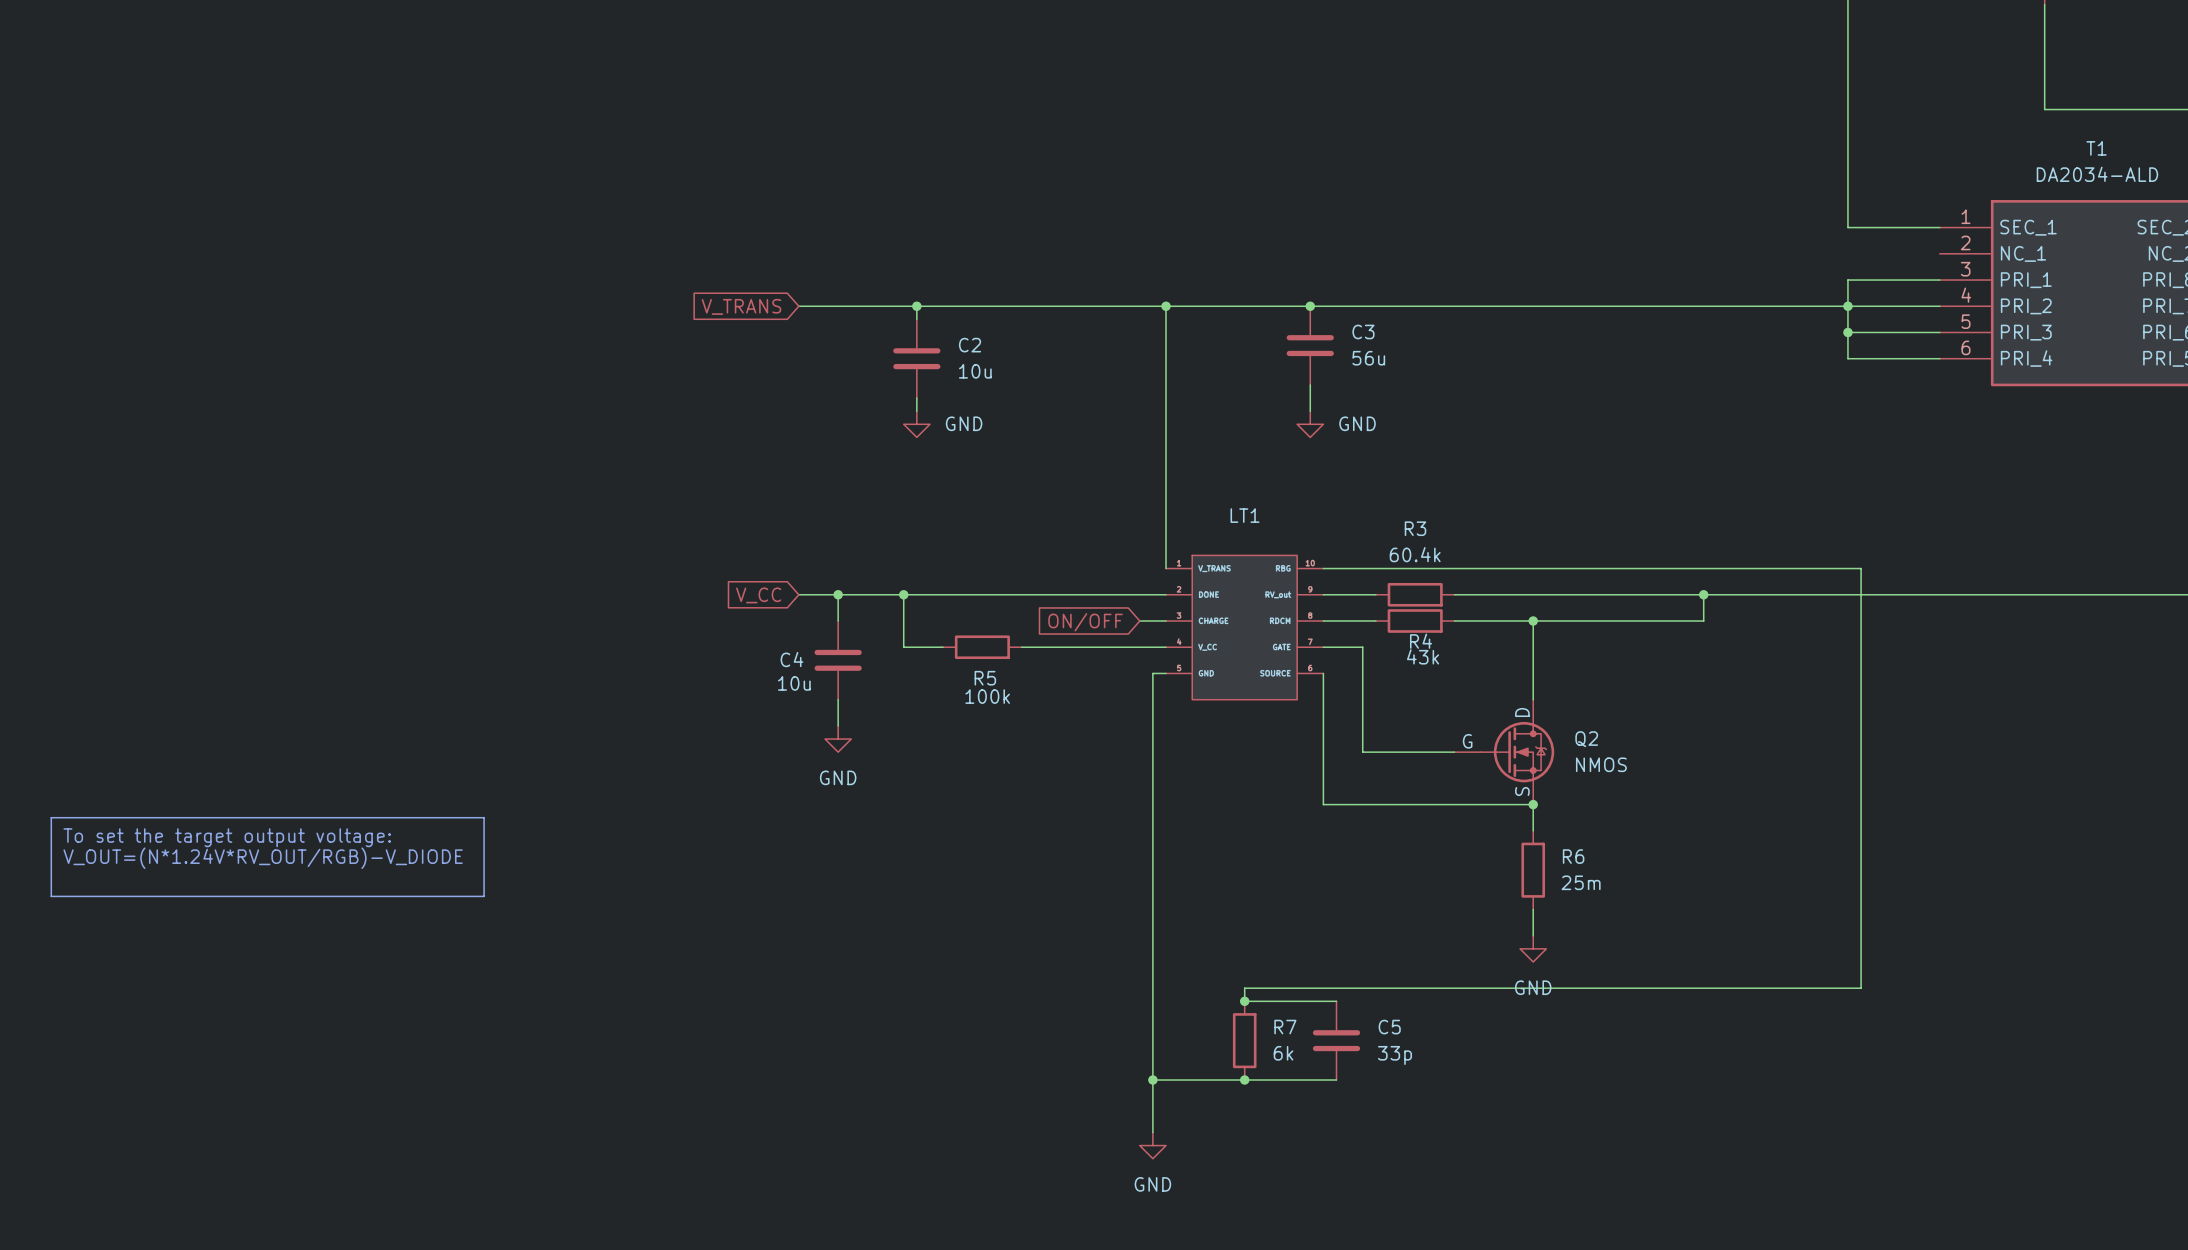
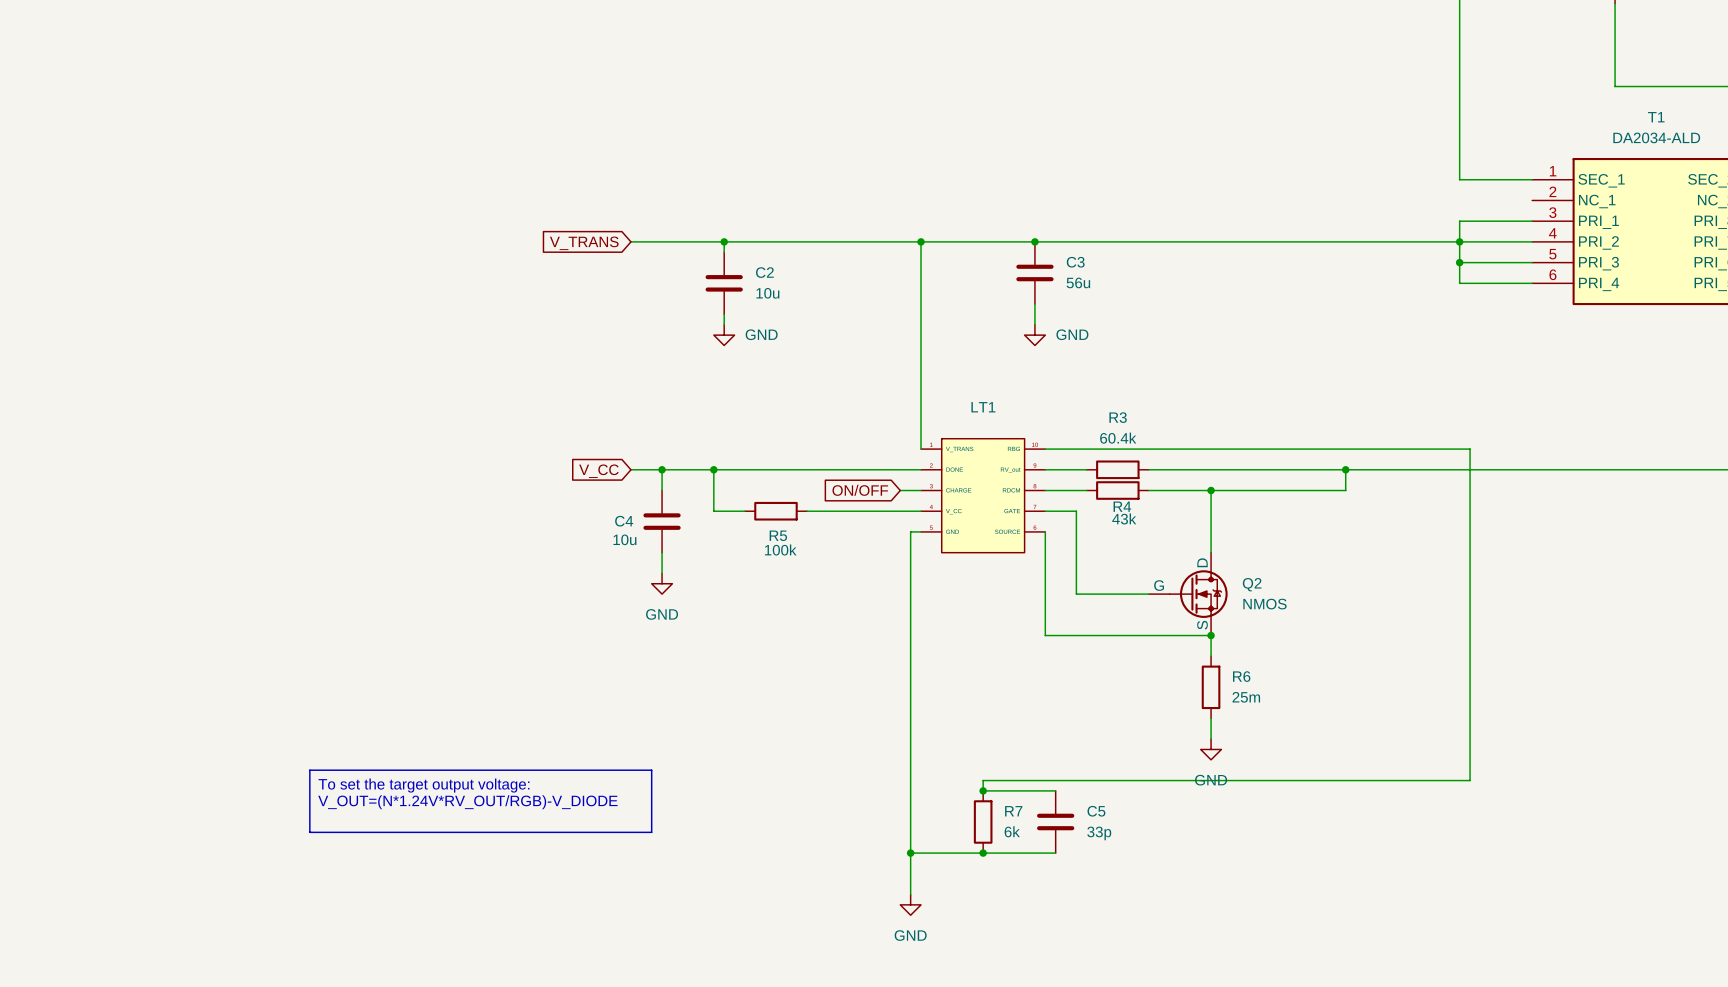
line: (51, 817) (484, 817) (484, 896) (51, 896) (51, 817) -> none
text: To set the target output voltage: (227, 837) -> none
text: V_OUT=(N*1.24V*RV_OUT/RGB)-V_DIODE (263, 858) -> none
line: none -> (309, 770) (651, 770) (651, 832) (309, 832) (309, 770)
text: none -> To set the target output voltage: (424, 785)
text: none -> V_OUT=(N*1.24V*RV_OUT/RGB)-V_DIODE (467, 802)

